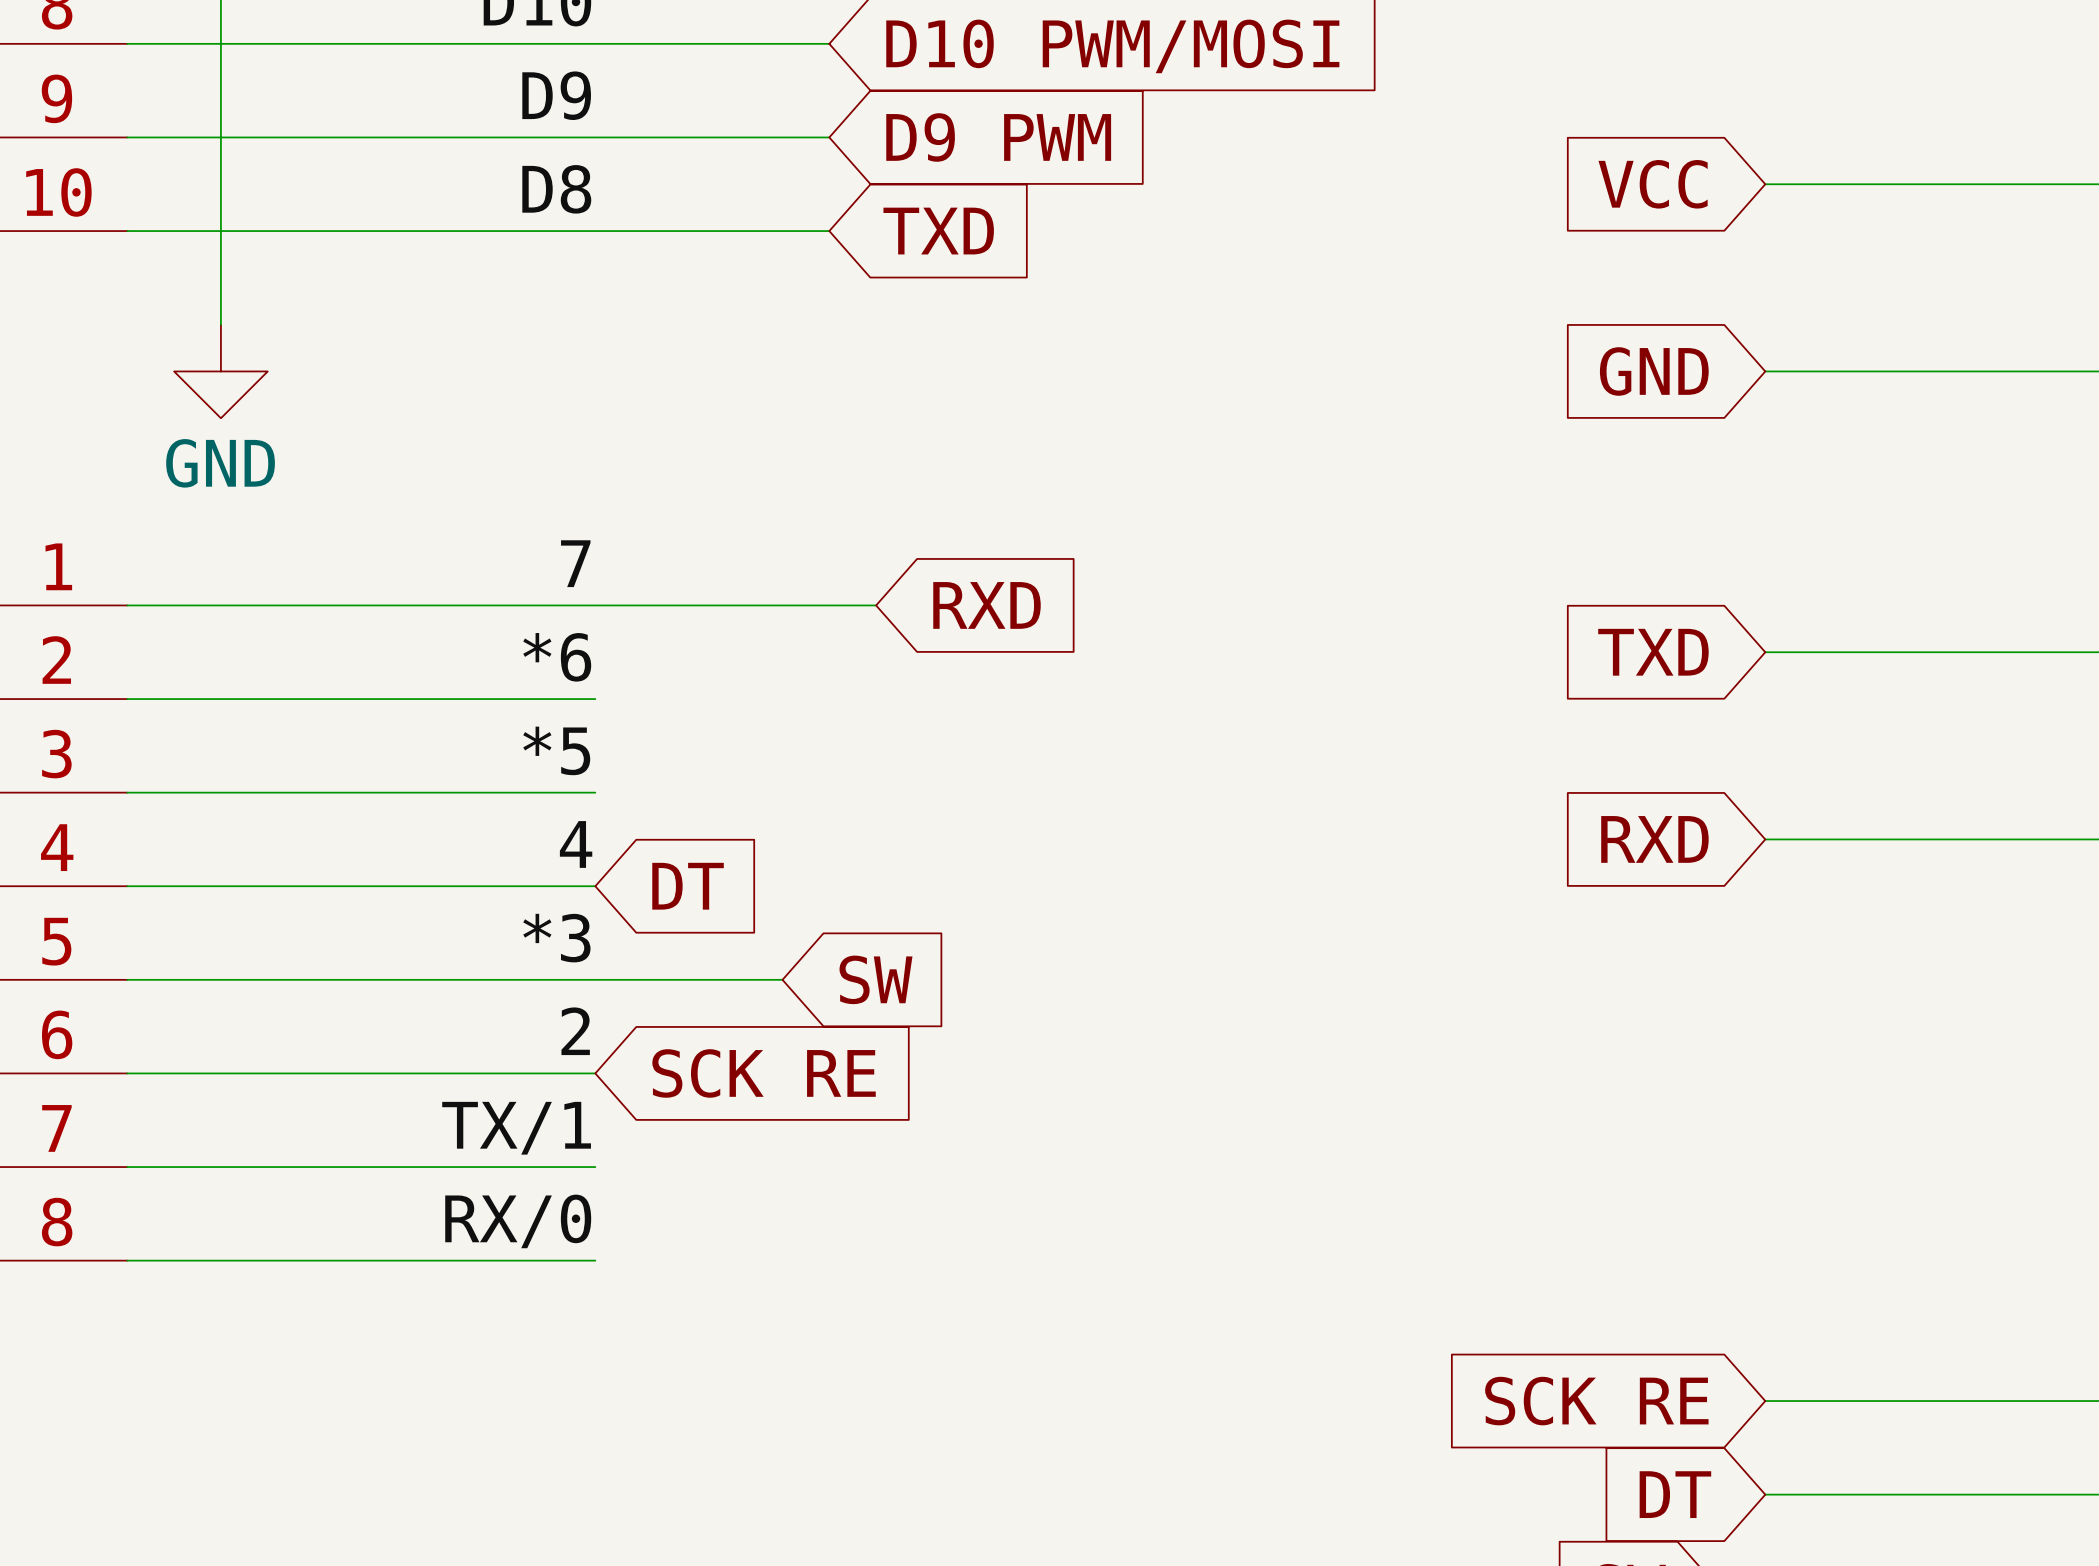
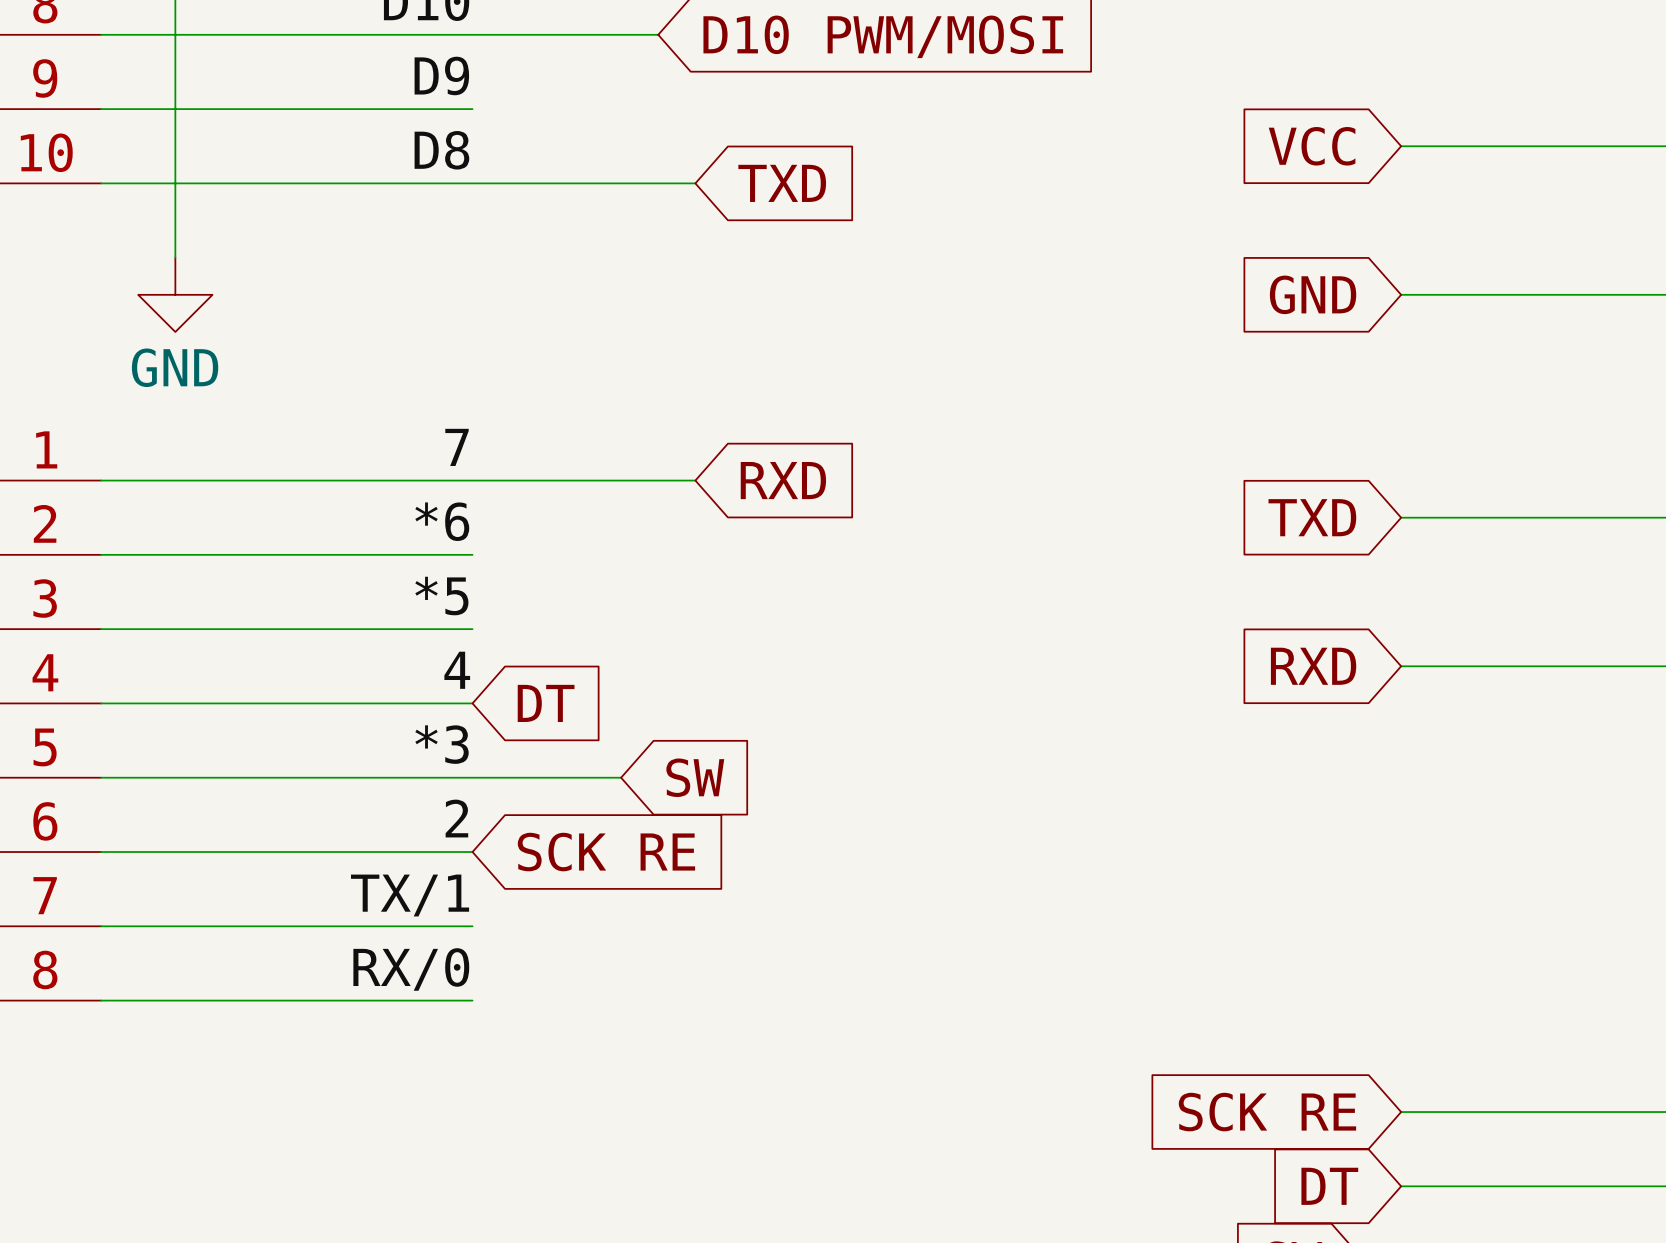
wire: (595, 137) (829, 137) -> none
global label: D9 PWM (998, 137) -> none
wire: none -> (658, 183) (695, 183)
global label position: TXD (938, 231) -> TXD (782, 183)

